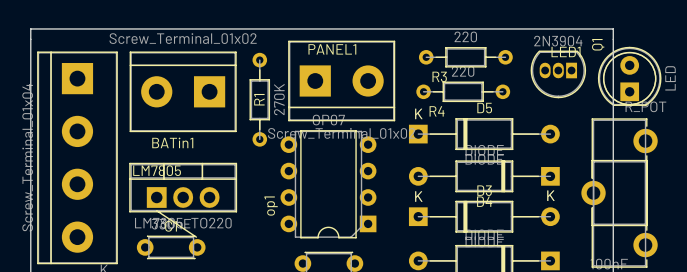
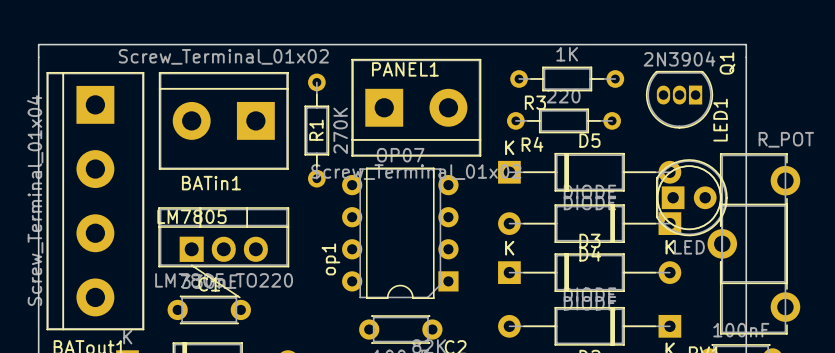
R3 value: 220 (465, 36) -> 1K (567, 54)
LED1 rotation: 0° (629, 76) -> 90° clockwise (691, 197)
LED1 position: (629, 76) -> (691, 197)

